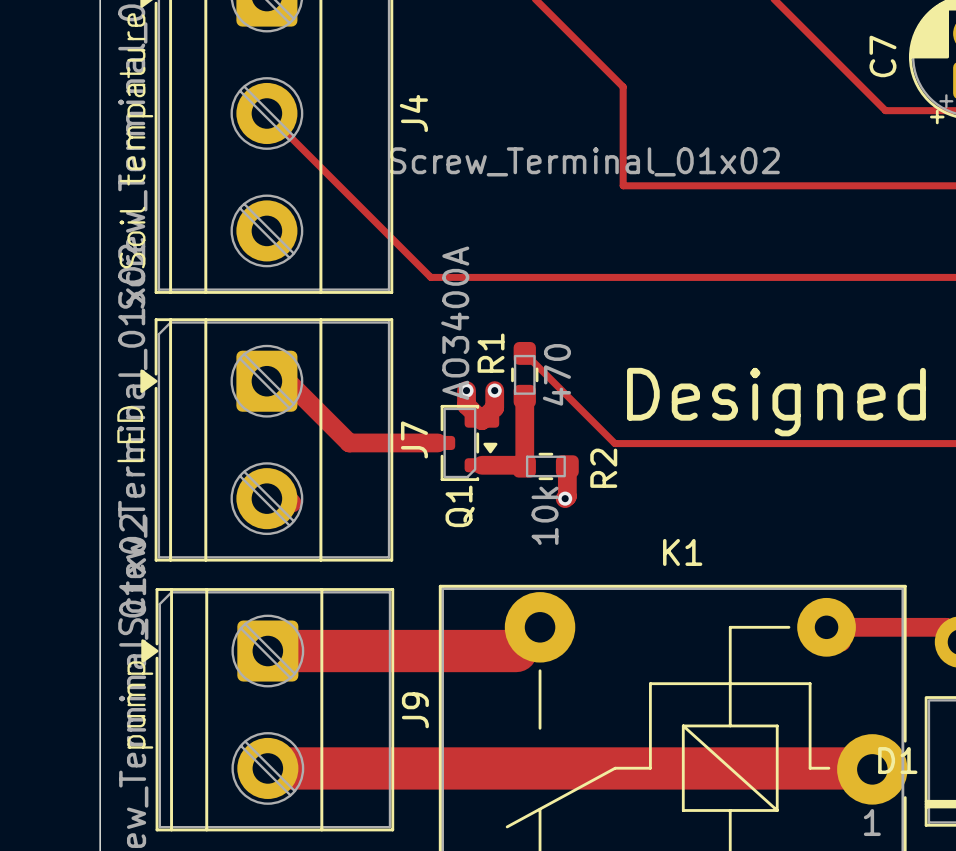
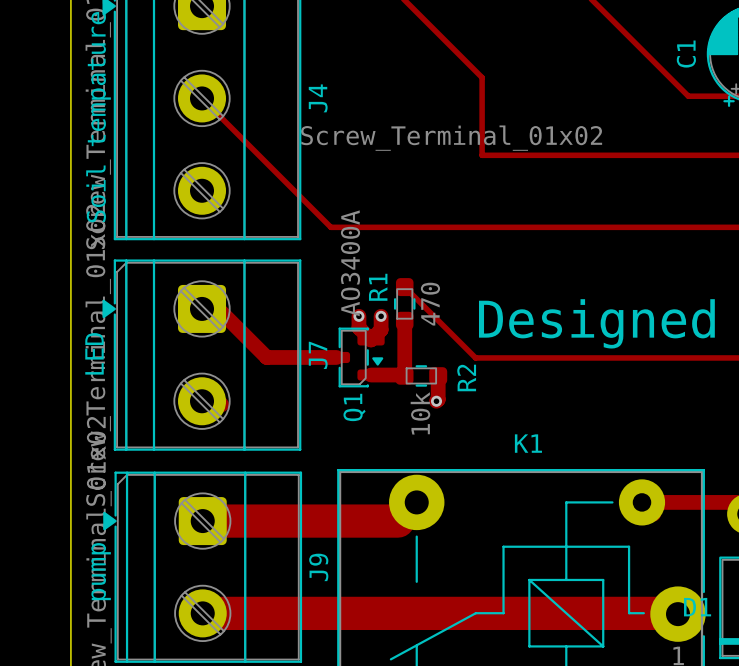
C7 name: C7 (882, 56) -> C1 (686, 54)

